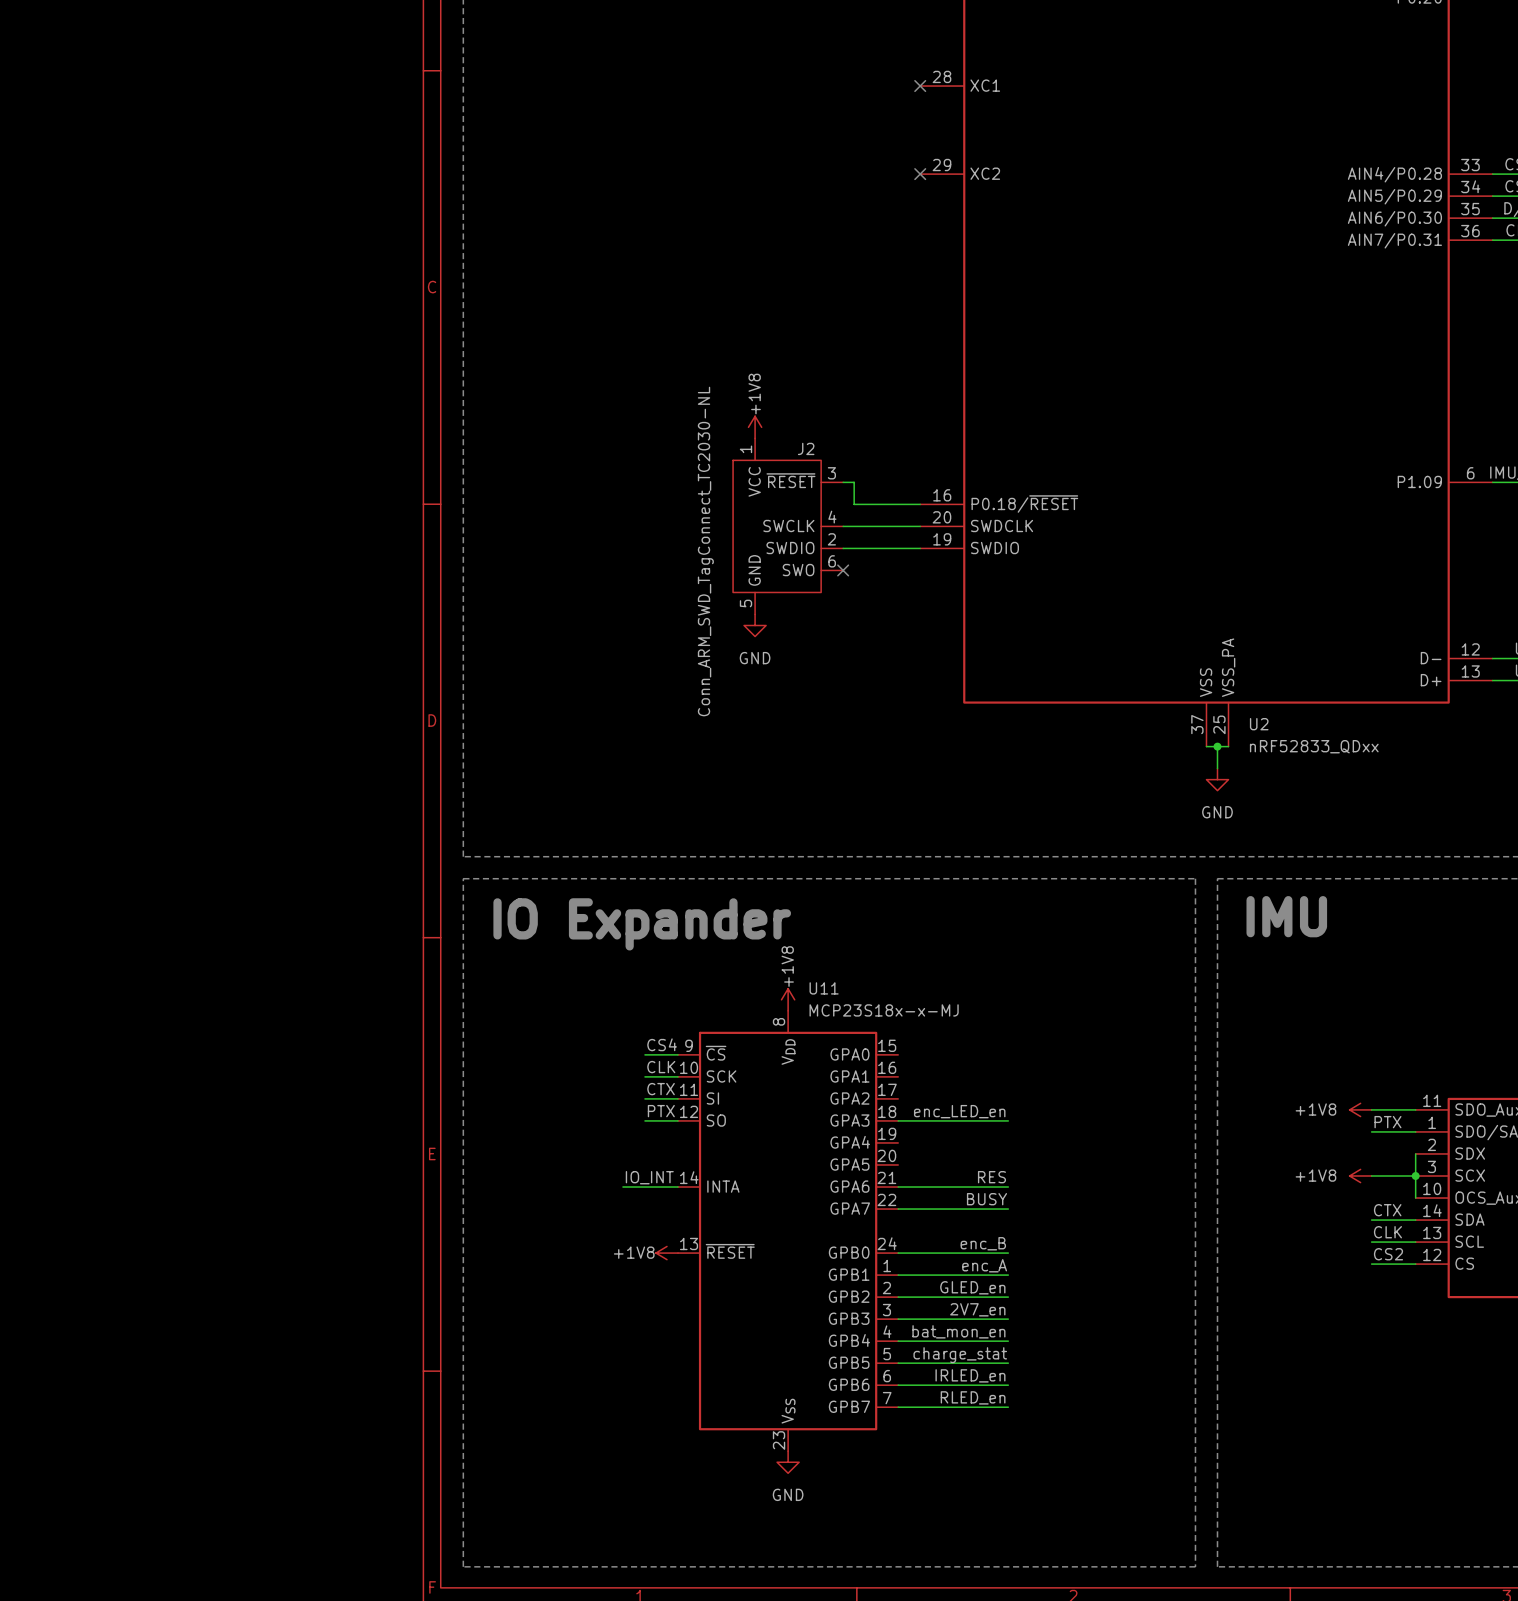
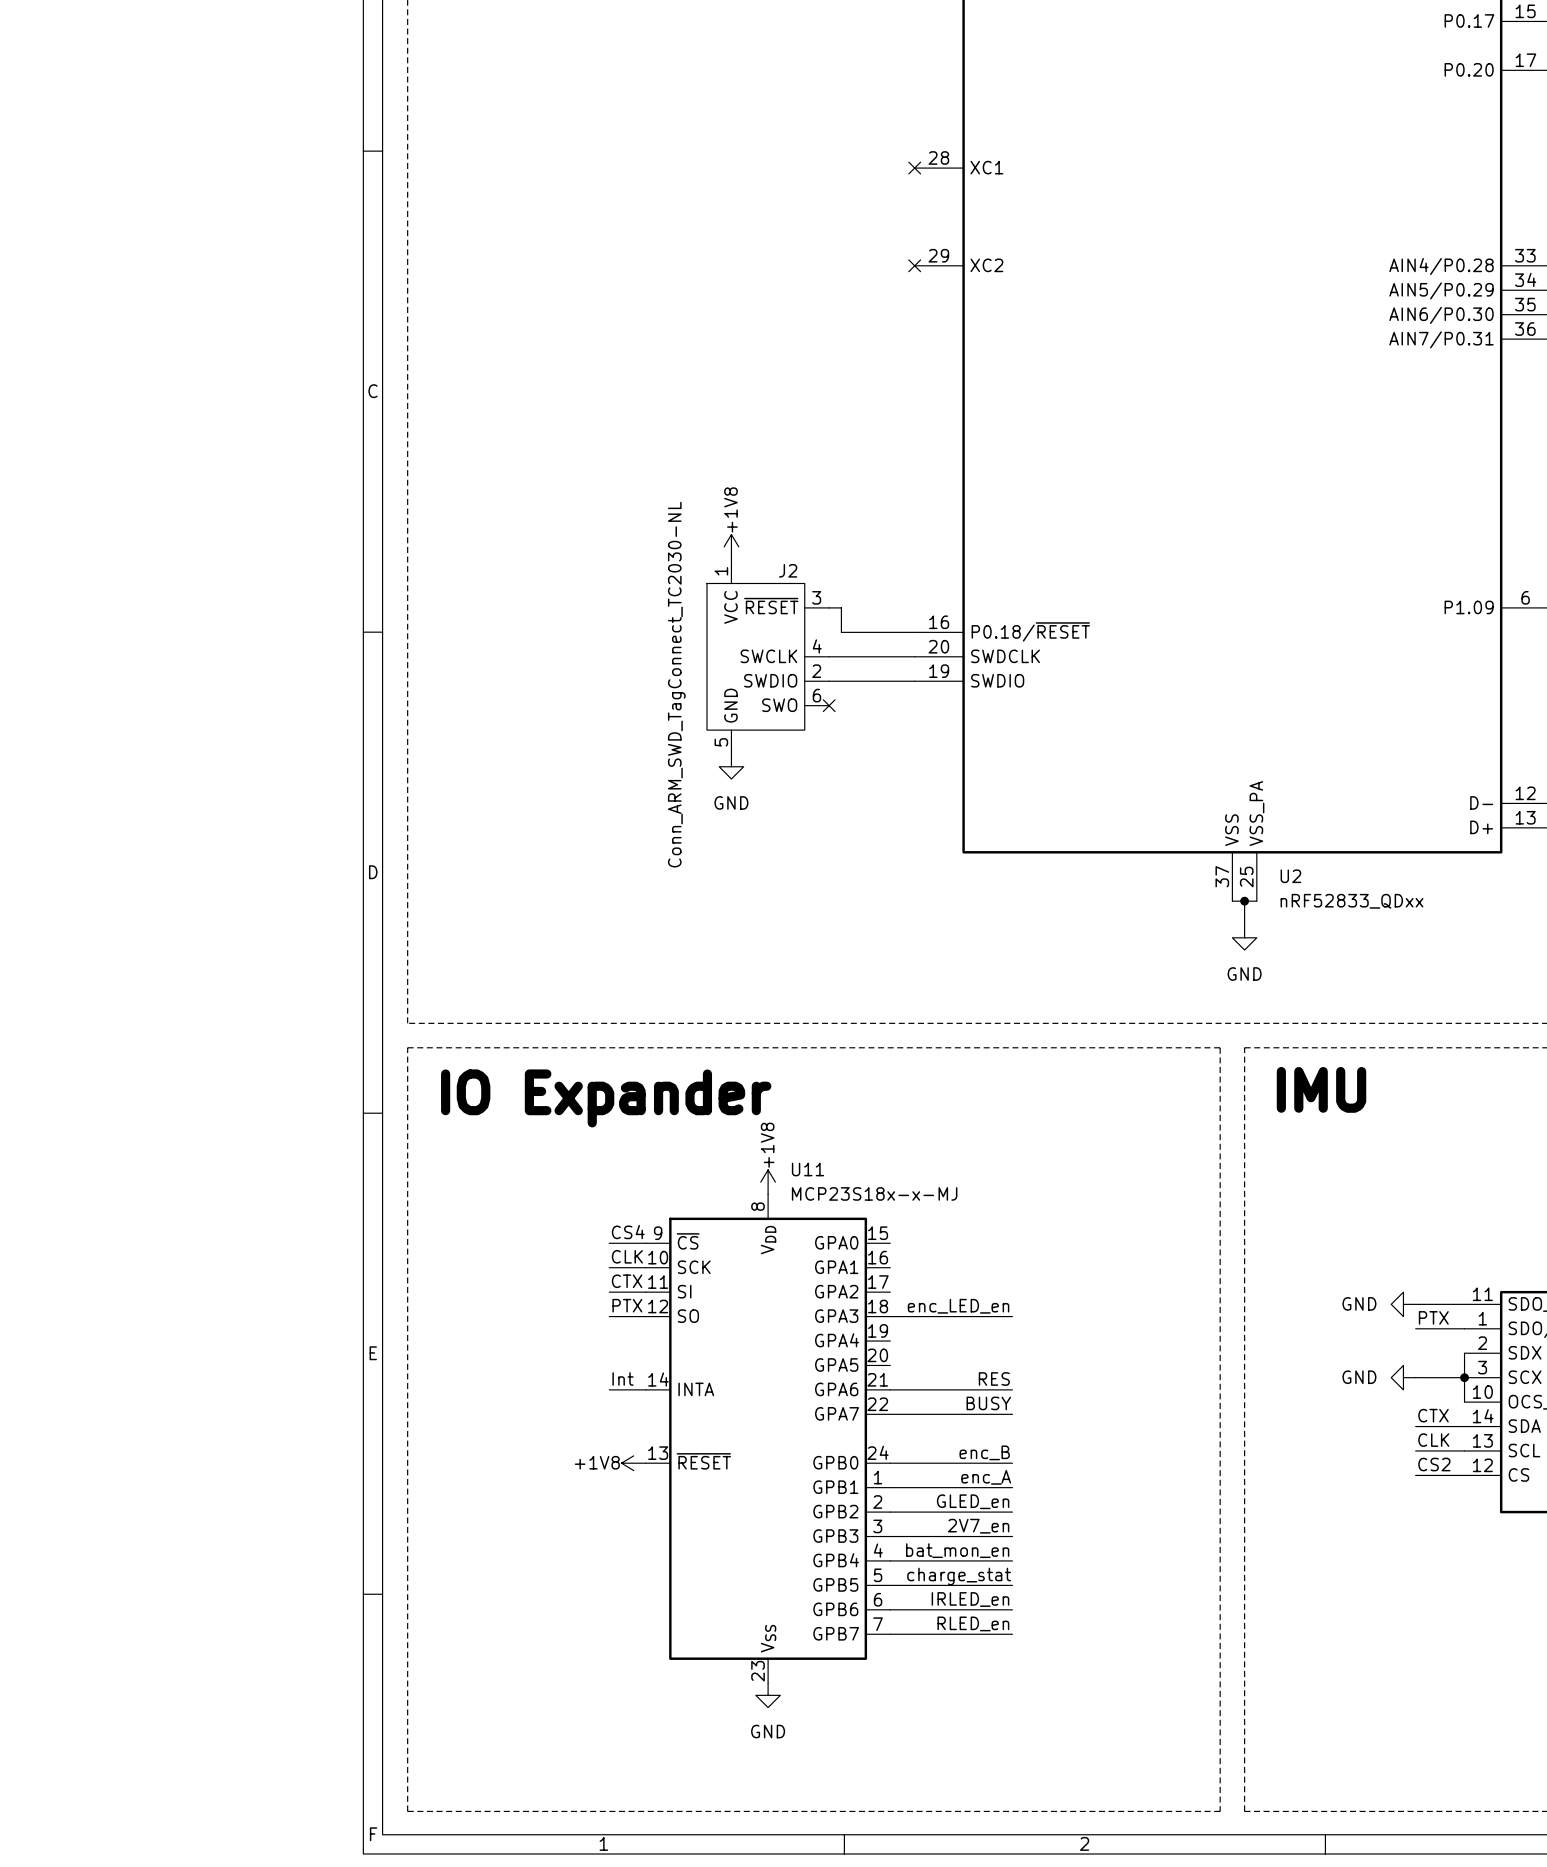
power symbol: +1V8 (1360, 1109) -> GND (1403, 1304)
power symbol: +1V8 (1360, 1175) -> GND (1403, 1377)
label: IO_INT (649, 1177) -> none
label: none -> Int (623, 1378)
wire: (622, 1187) (644, 1187) -> none

